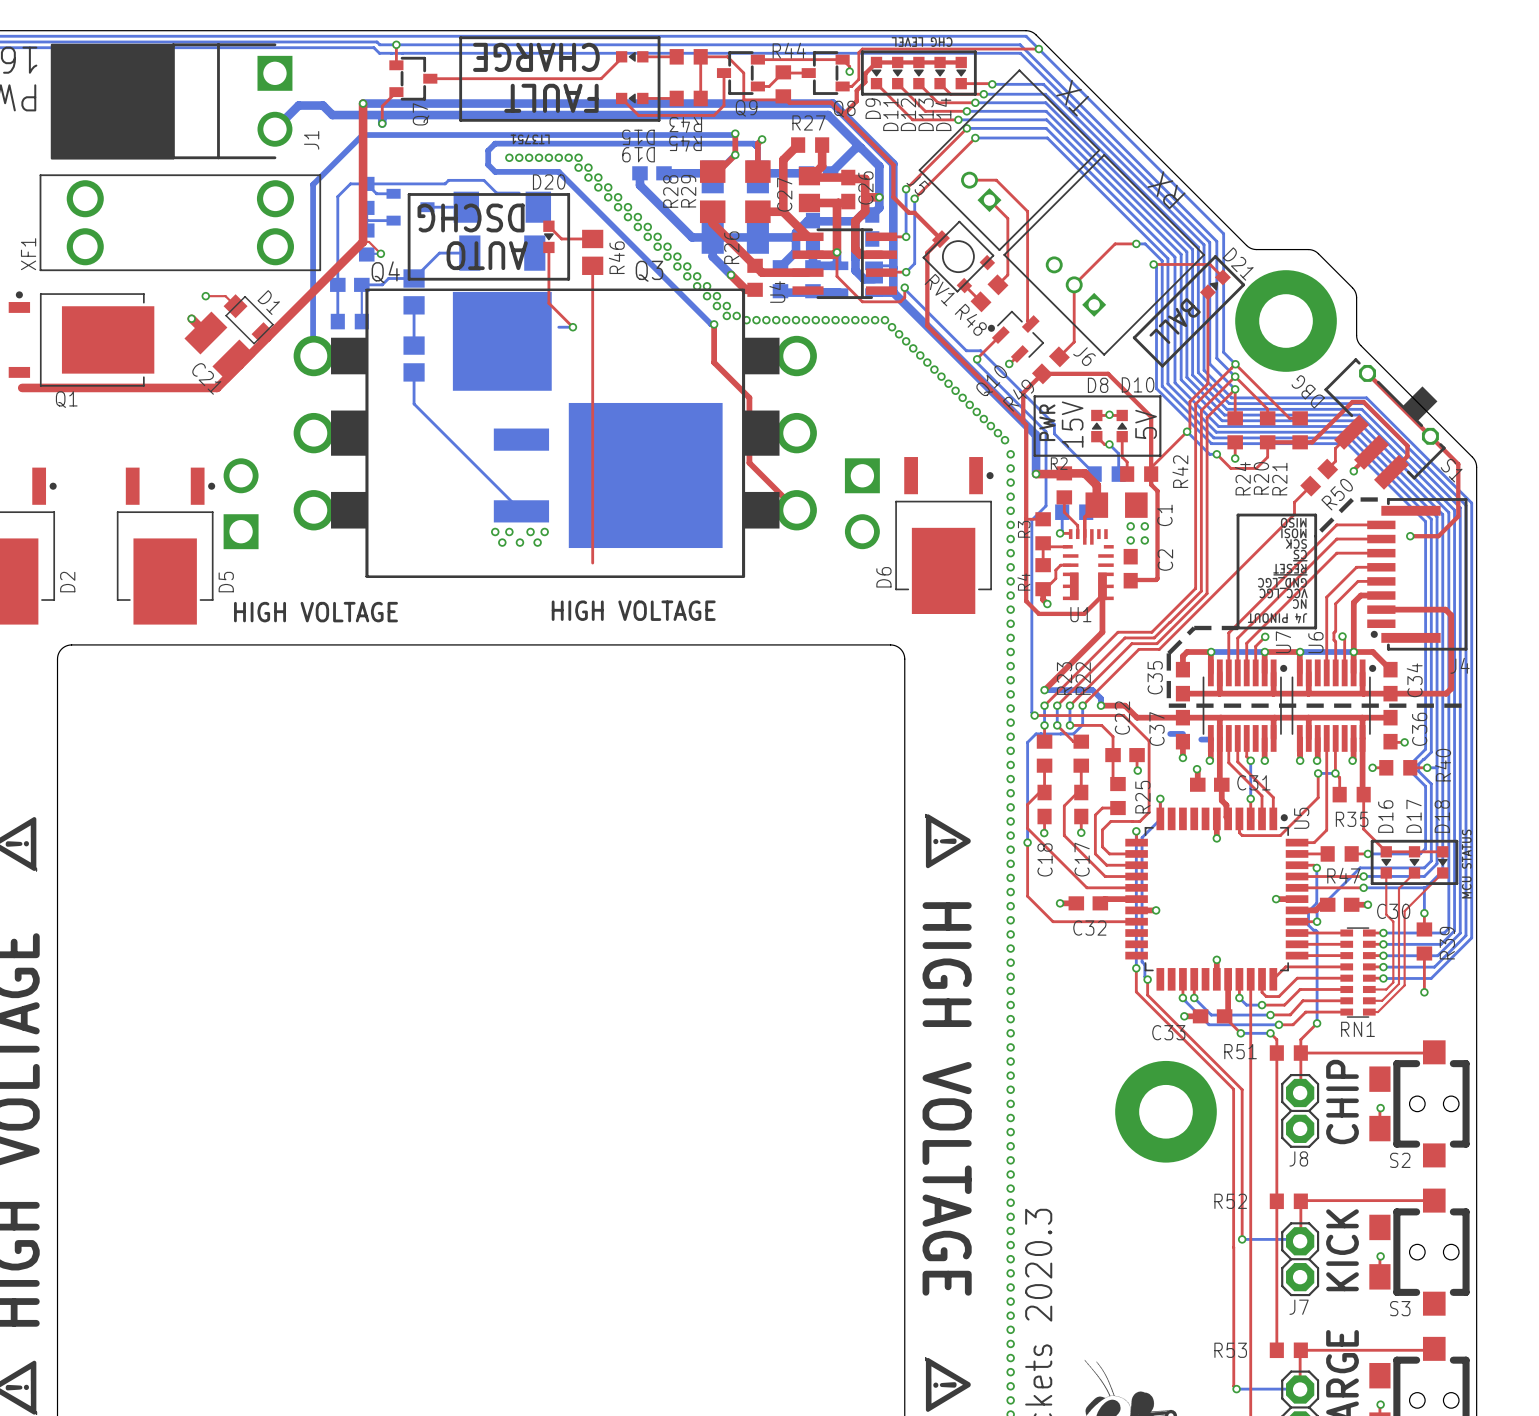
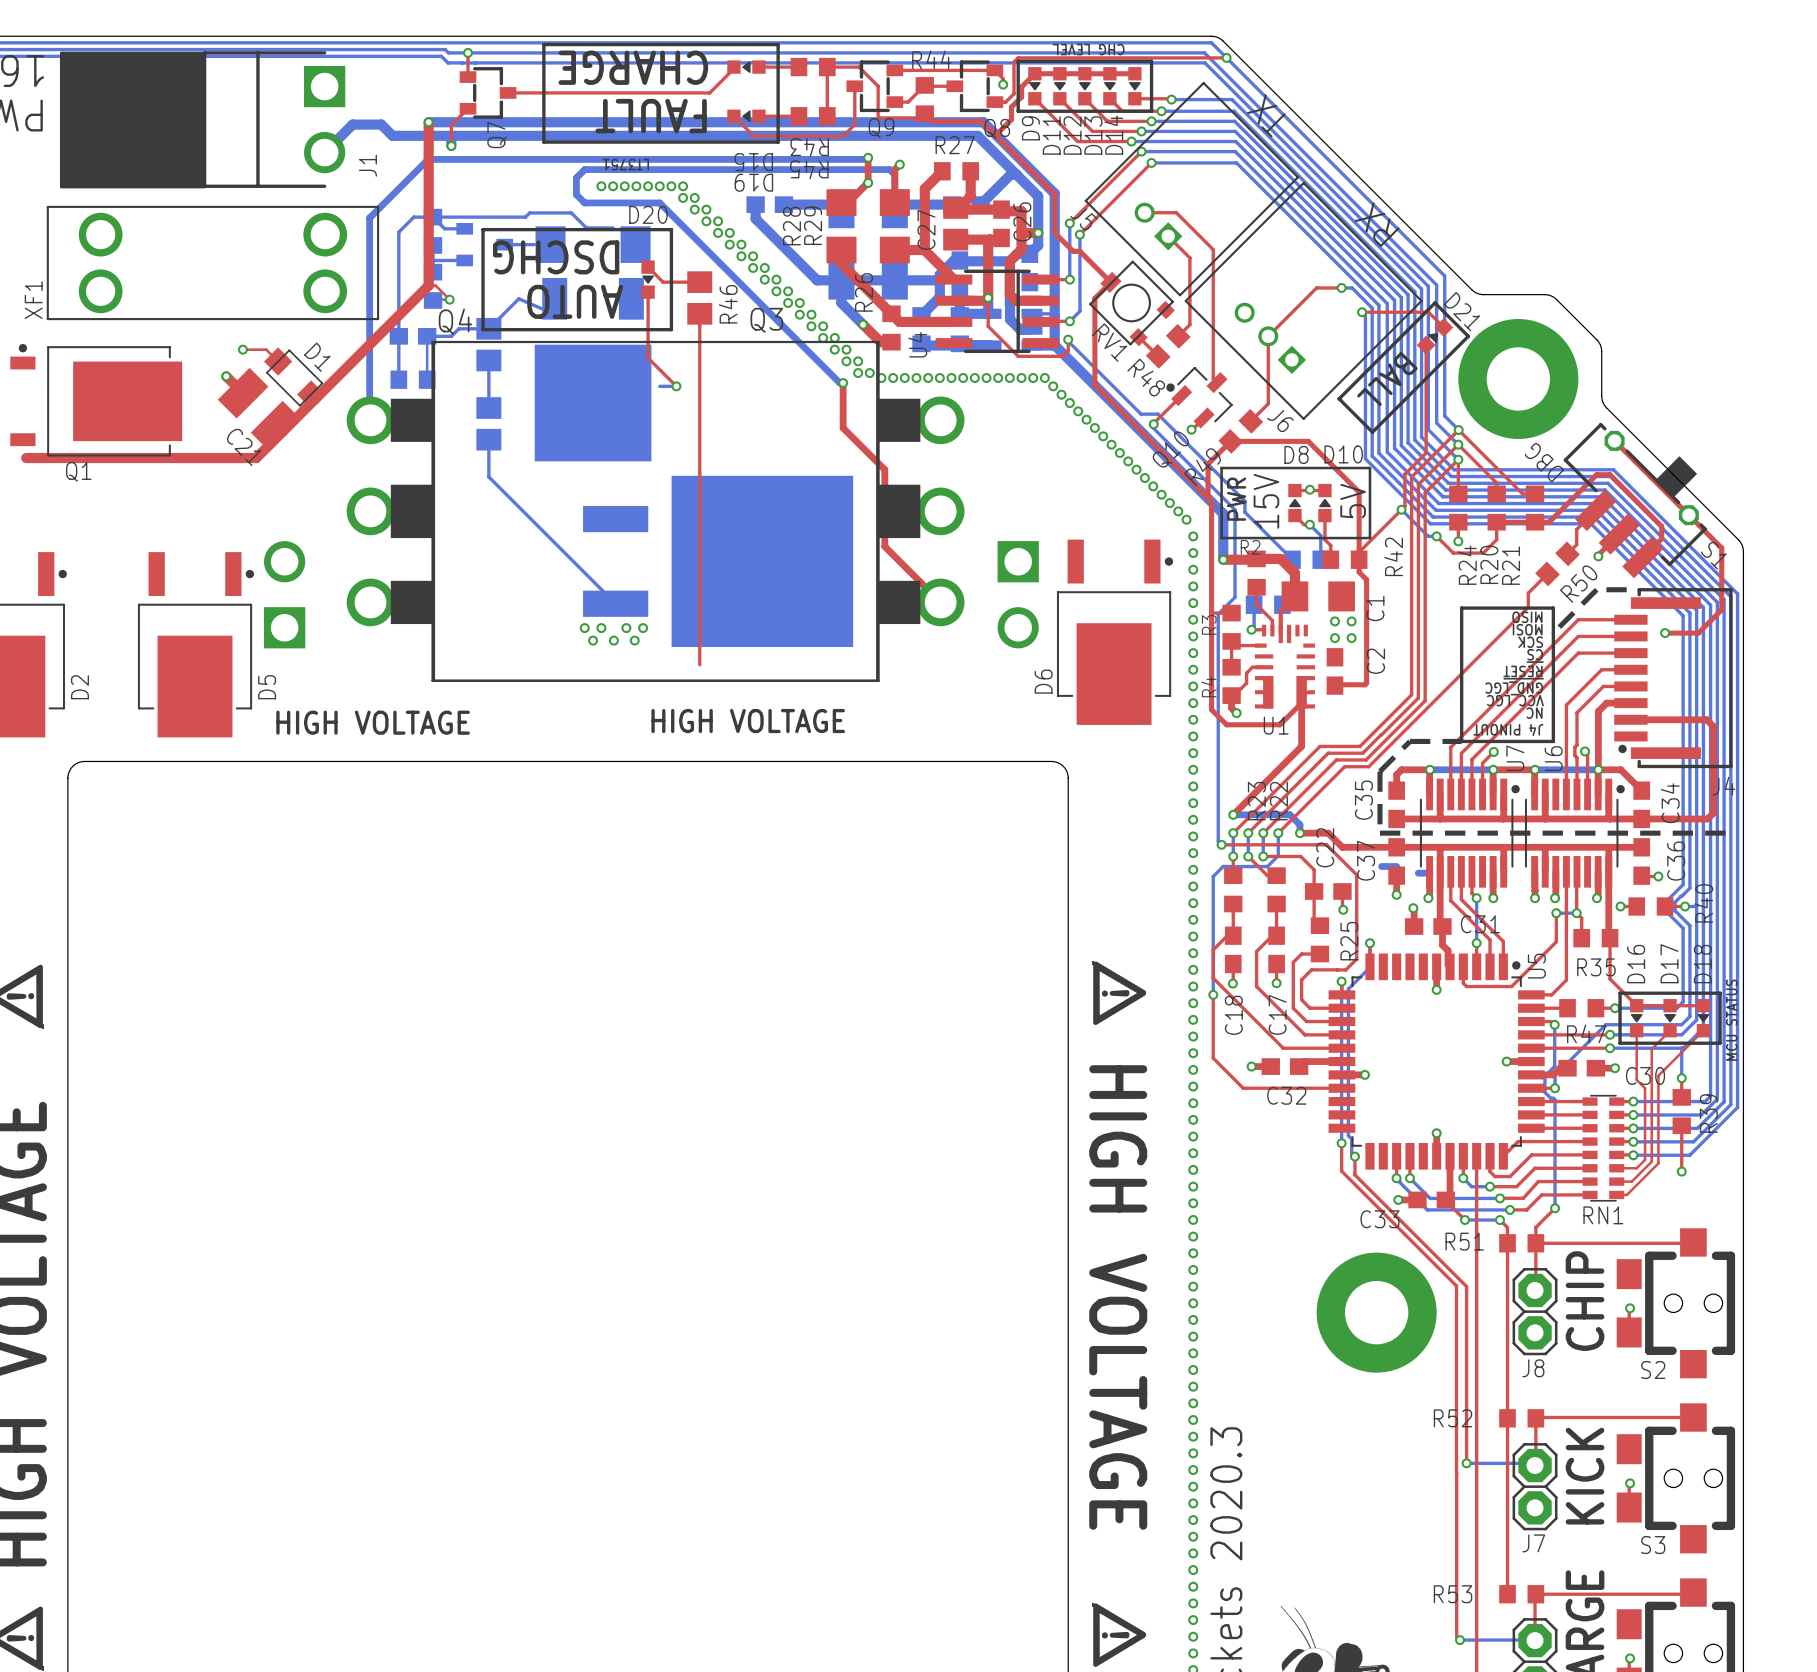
bottom track: (439, 253) (469, 253) -> (518, 298) (555, 314)

